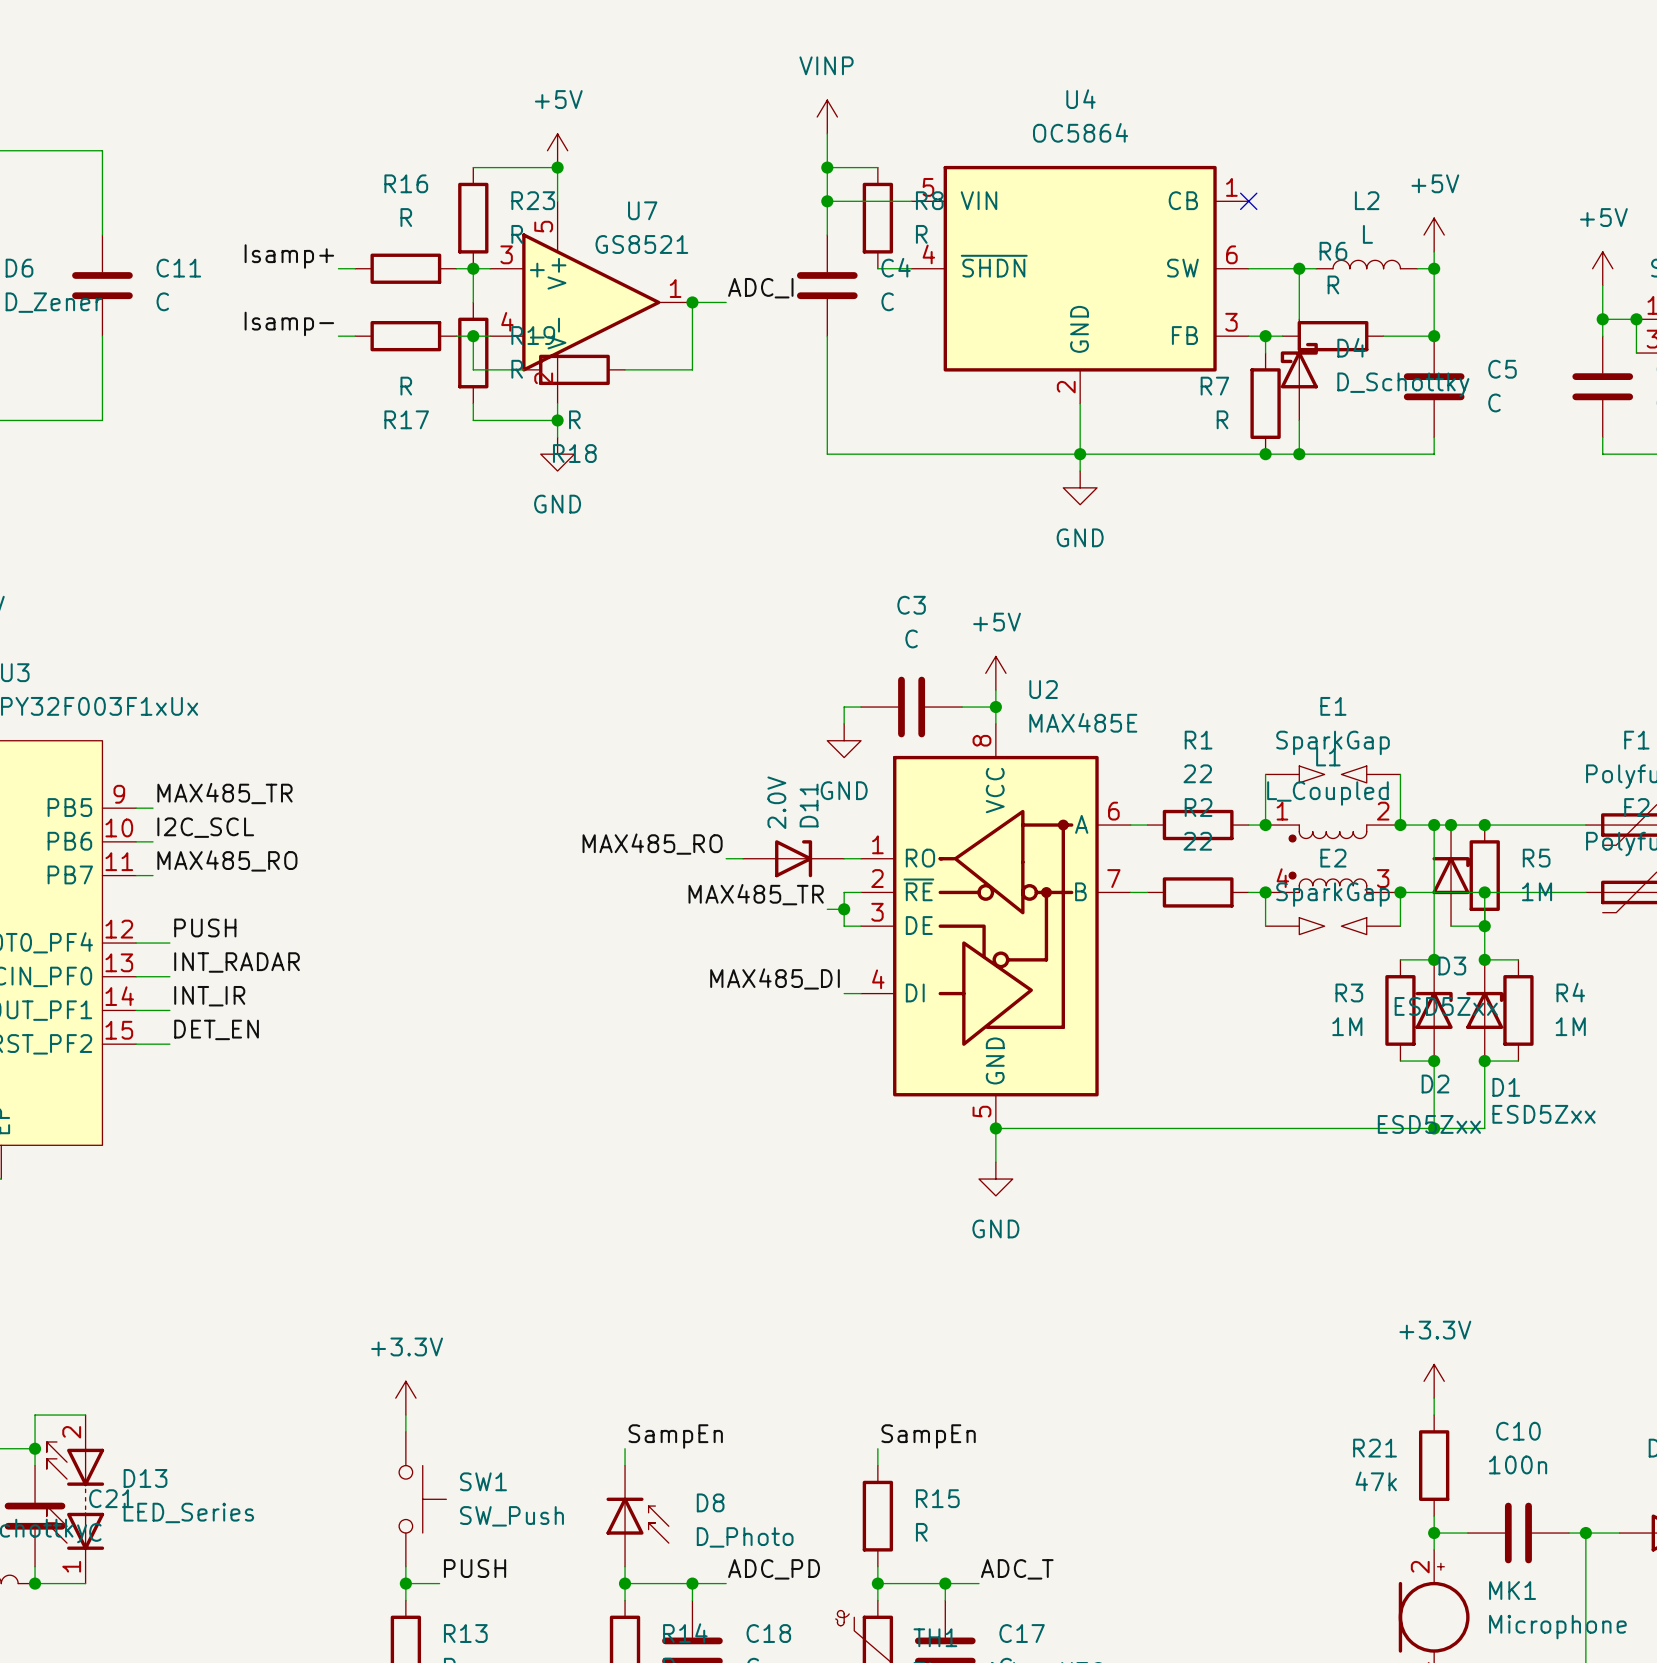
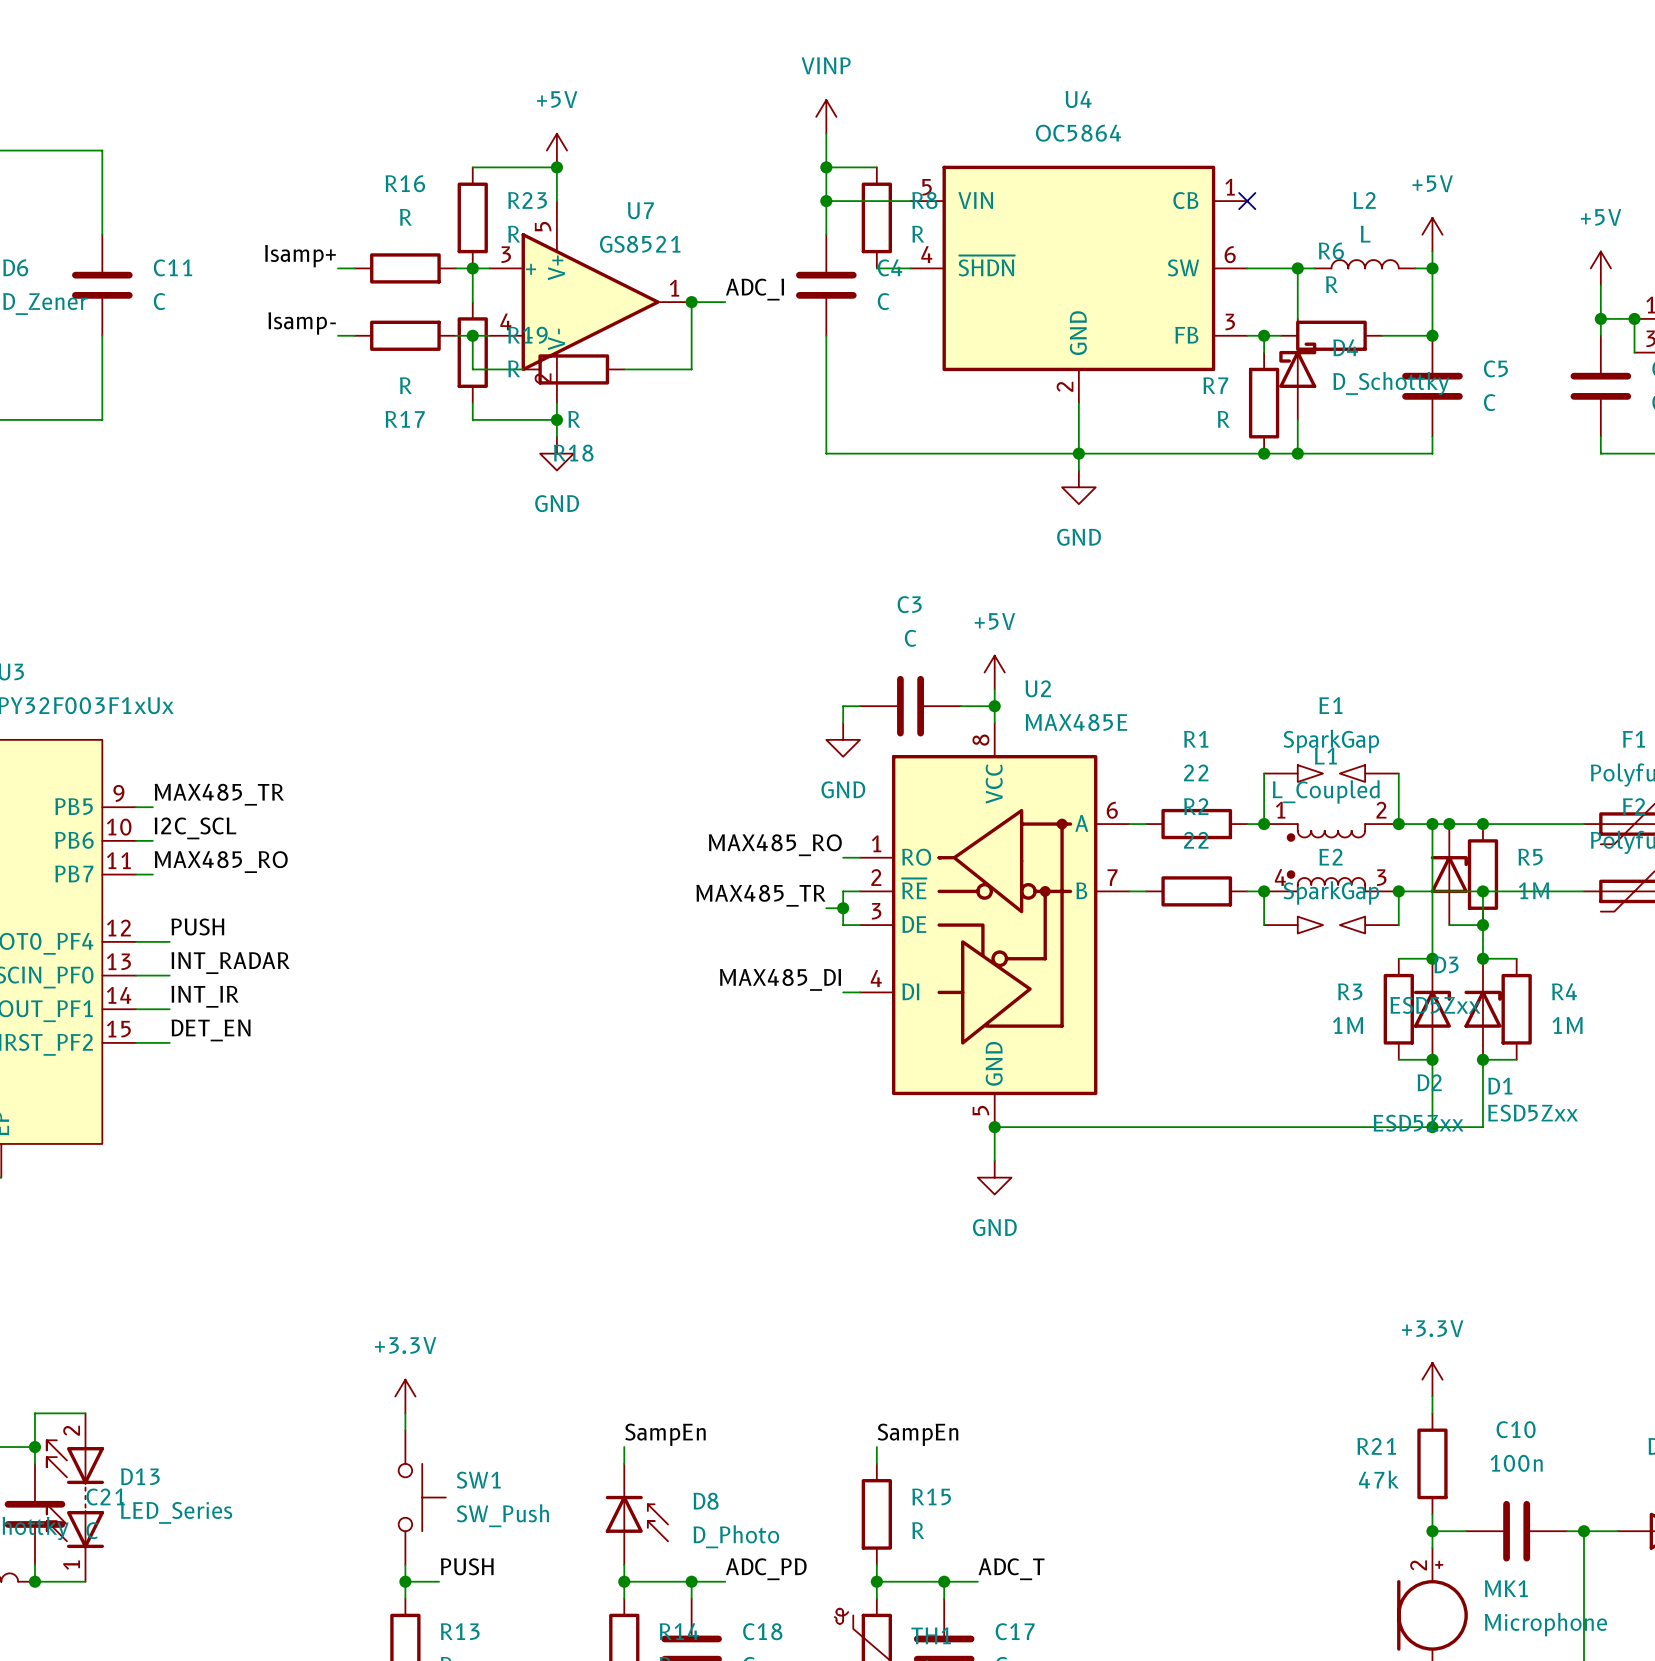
label position: MAX485_RO (652, 844) -> MAX485_RO (775, 845)
wire: (726, 858) (743, 858) -> none
D11: 2.0V (793, 858) -> none

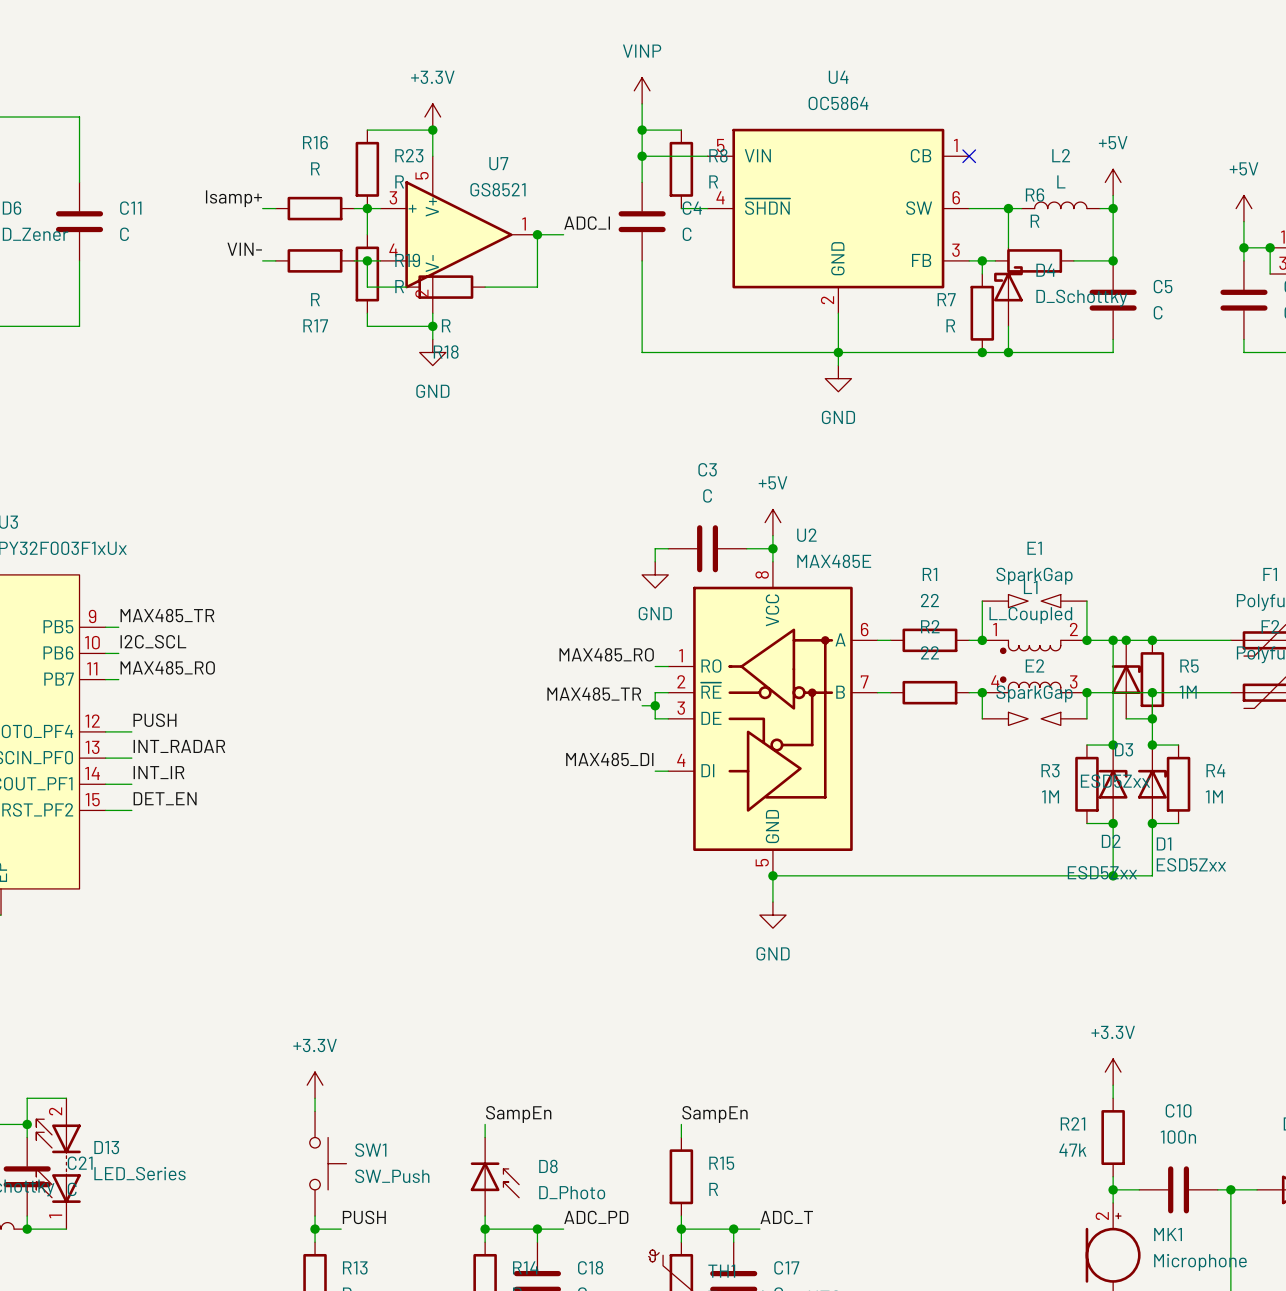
power symbol: +5V (556, 150) -> +3.3V (432, 117)
label: Isamp- (302, 323) -> VIN- (244, 249)

